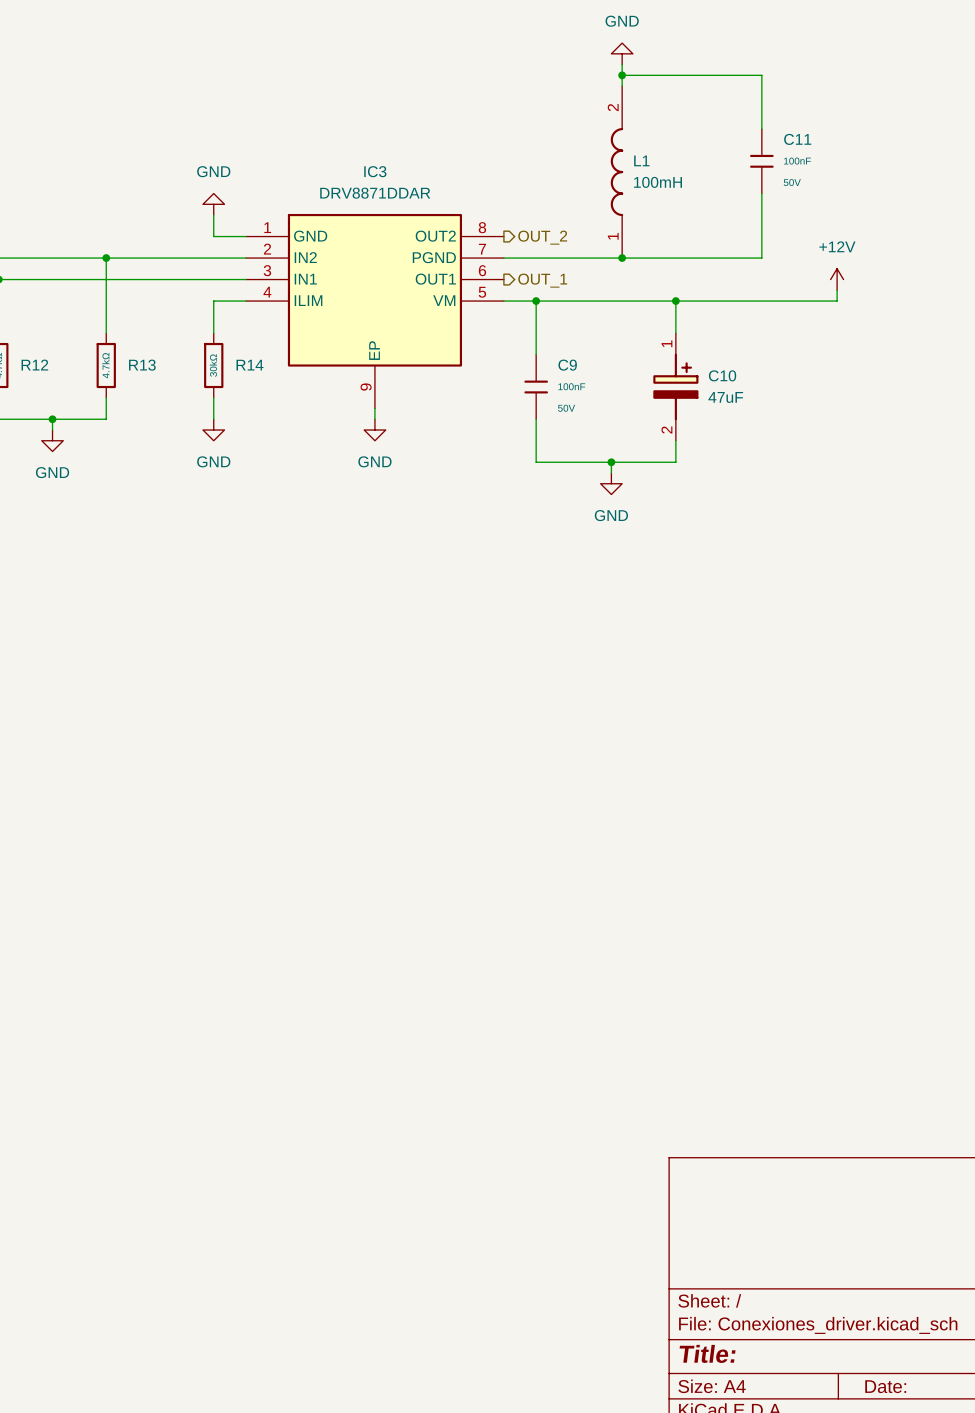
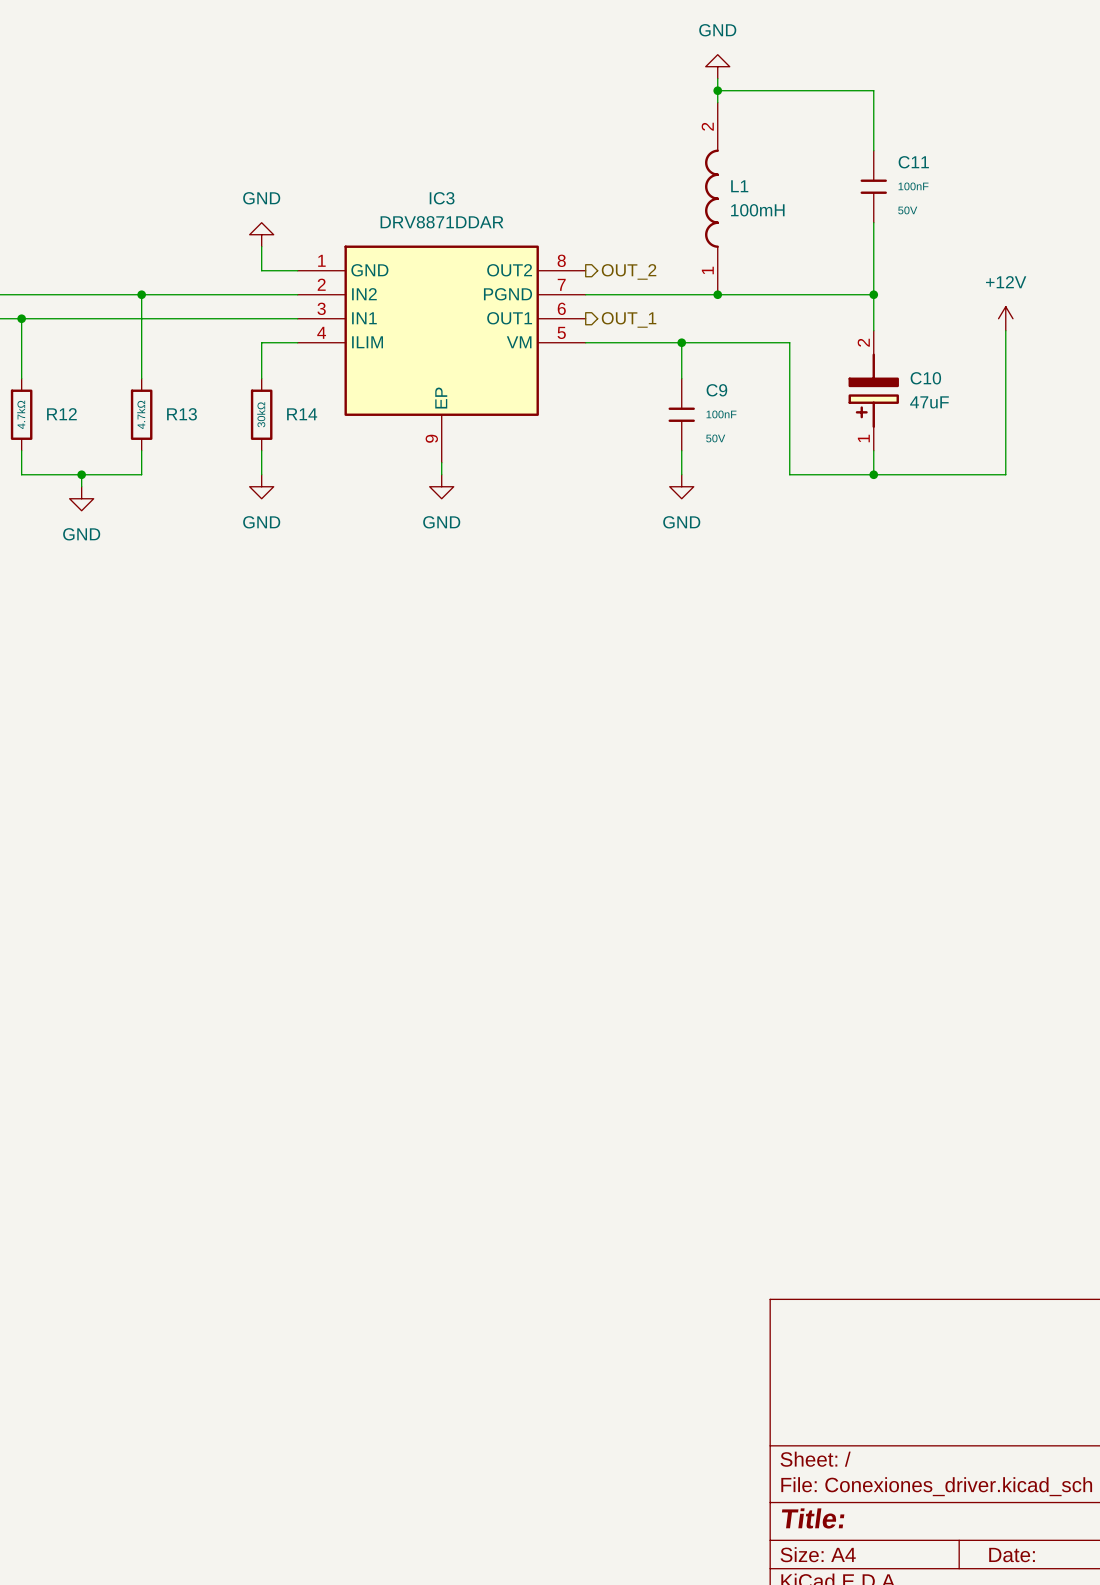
wire: none -> (873, 294) (873, 330)
junction: none -> (873, 294)
power symbol position: +12V (837, 279) -> +12V (1005, 318)
wire: (837, 290) (837, 301) (686, 301) -> (1005, 330) (1005, 474) (789, 474) (789, 342)
wire: (536, 301) (536, 354) -> none
junction: (536, 301) -> none
junction: none -> (681, 342)
wire: (675, 301) (675, 333) -> (681, 342) (681, 378)
junction: (675, 301) -> none
C9 position: (536, 387) -> (681, 414)
C10 rotation: 0° (675, 387) -> 180° (873, 390)
C10 position: (675, 387) -> (873, 390)
wire: none -> (681, 450) (681, 474)
wire: none -> (873, 450) (873, 474)
wire: (536, 419) (536, 462) (675, 462) (675, 440) -> none
junction: none -> (873, 474)
wire: (611, 462) (611, 472) -> none
junction: (611, 462) -> none
power symbol position: GND (611, 483) -> GND (681, 486)

